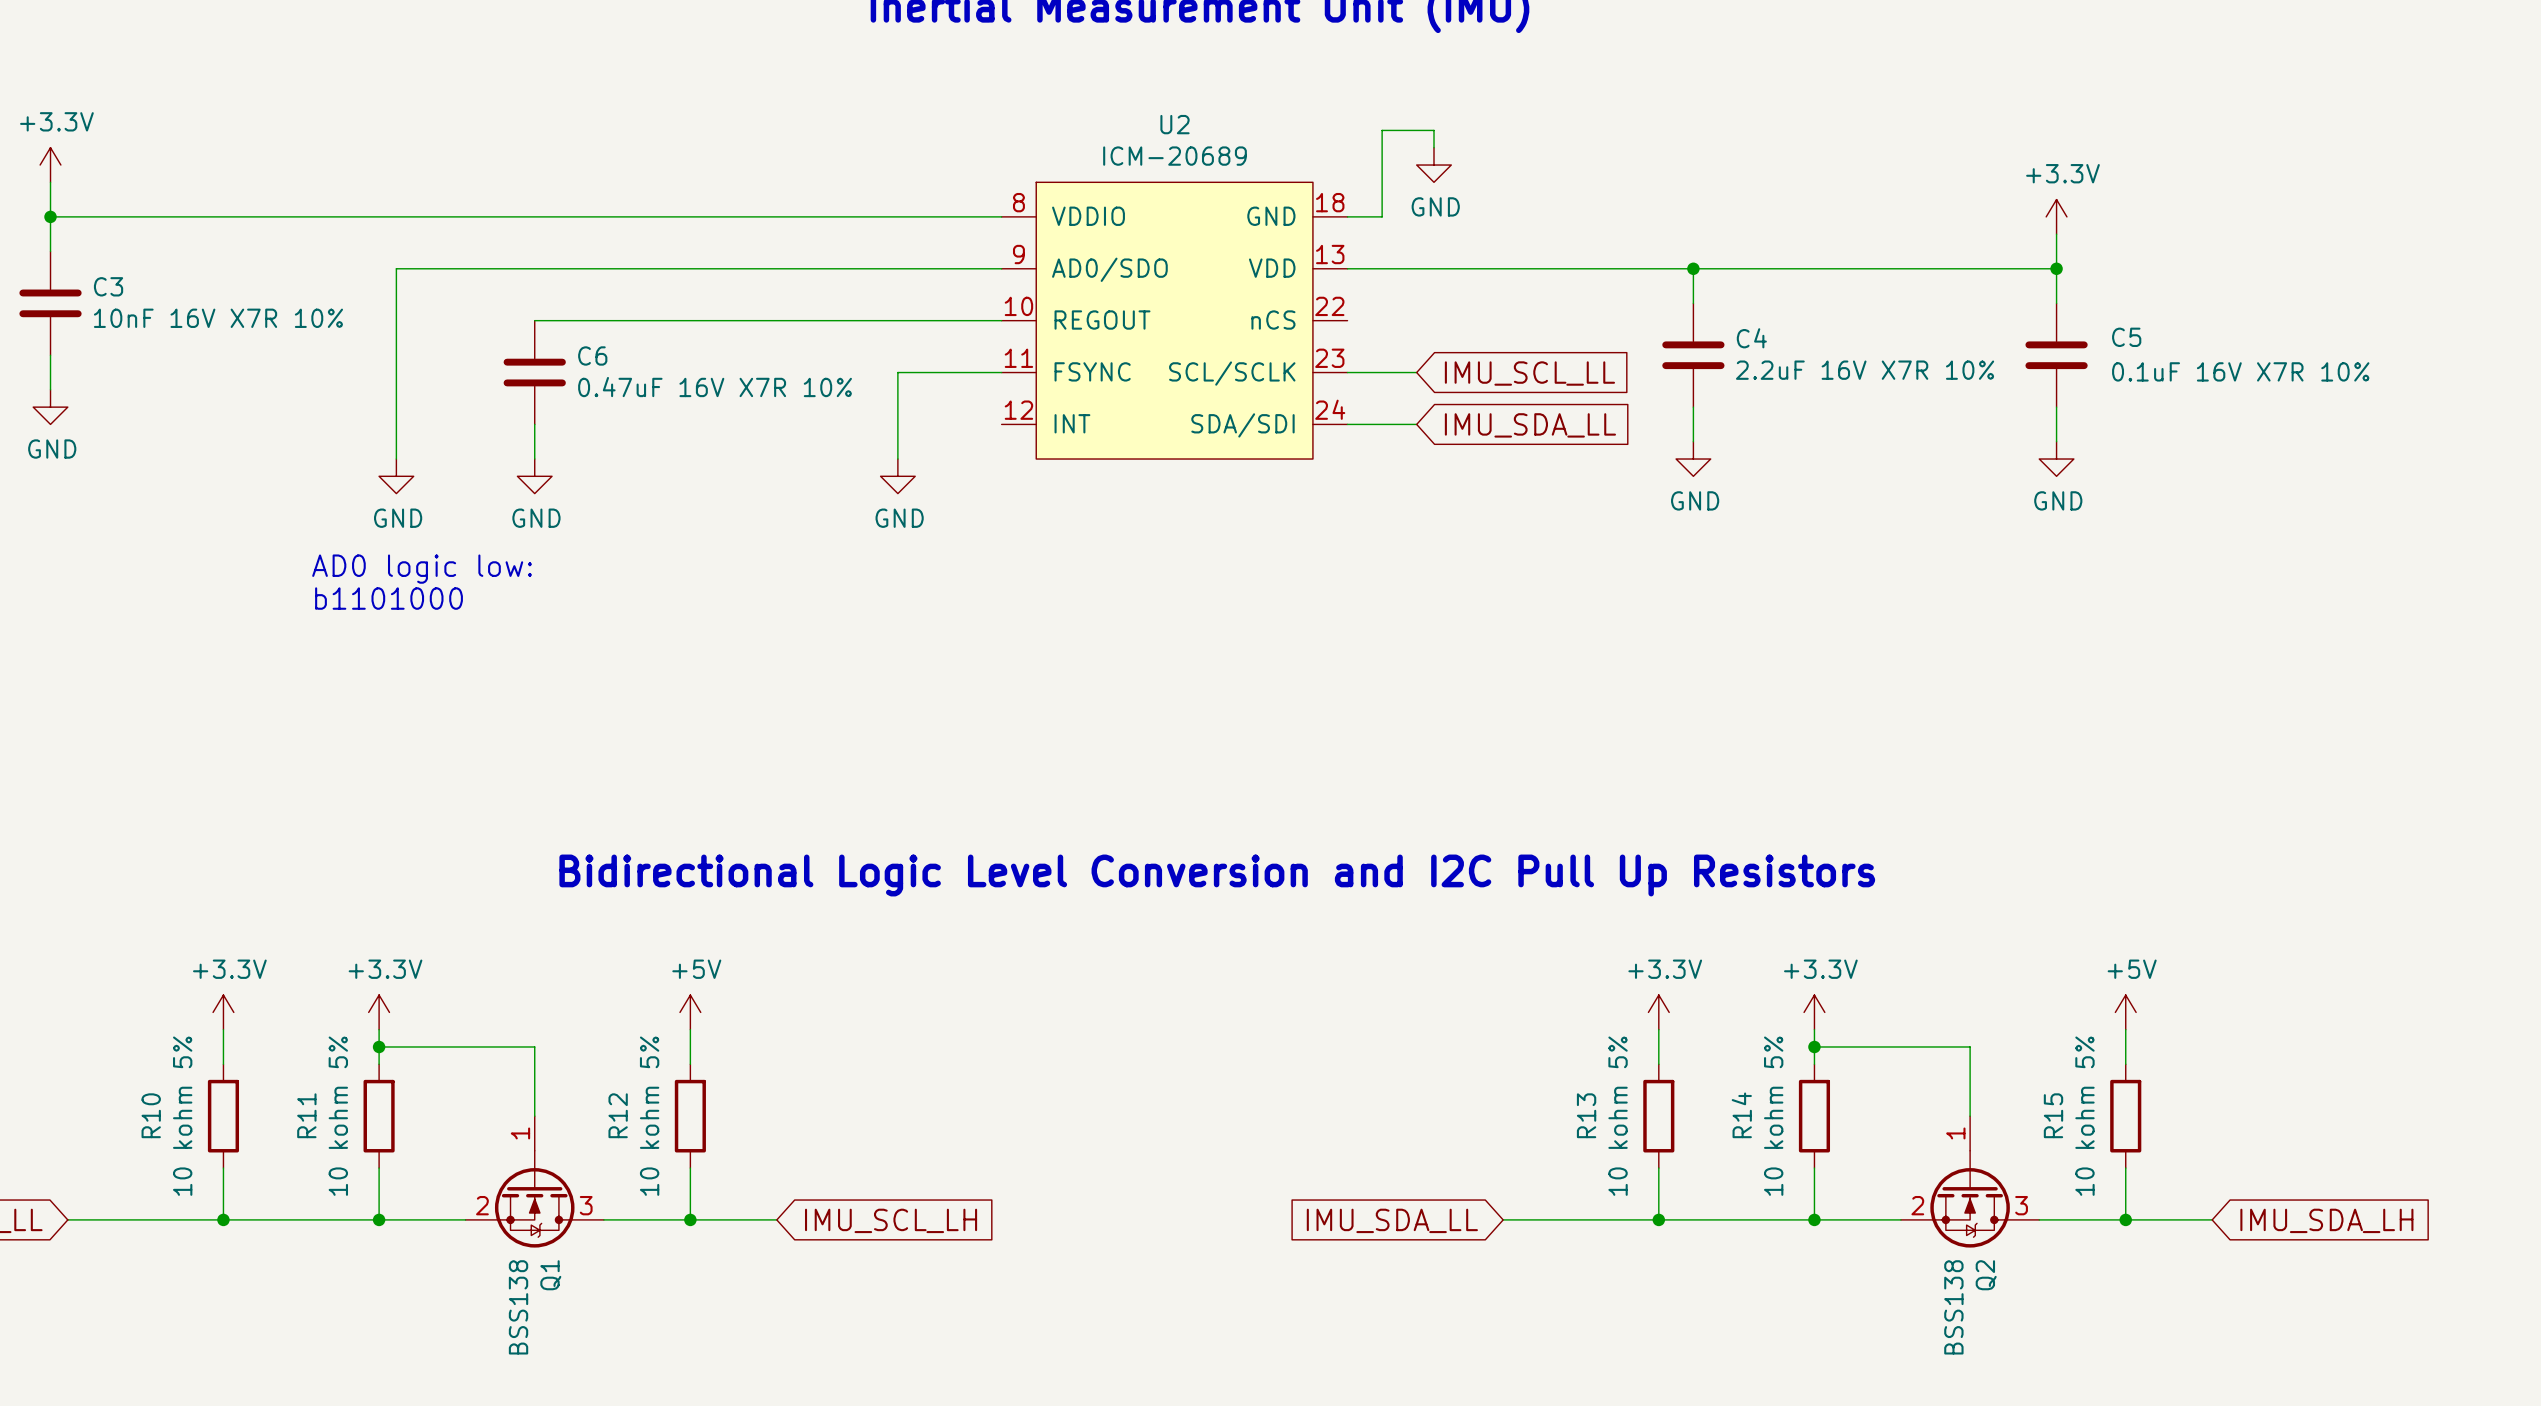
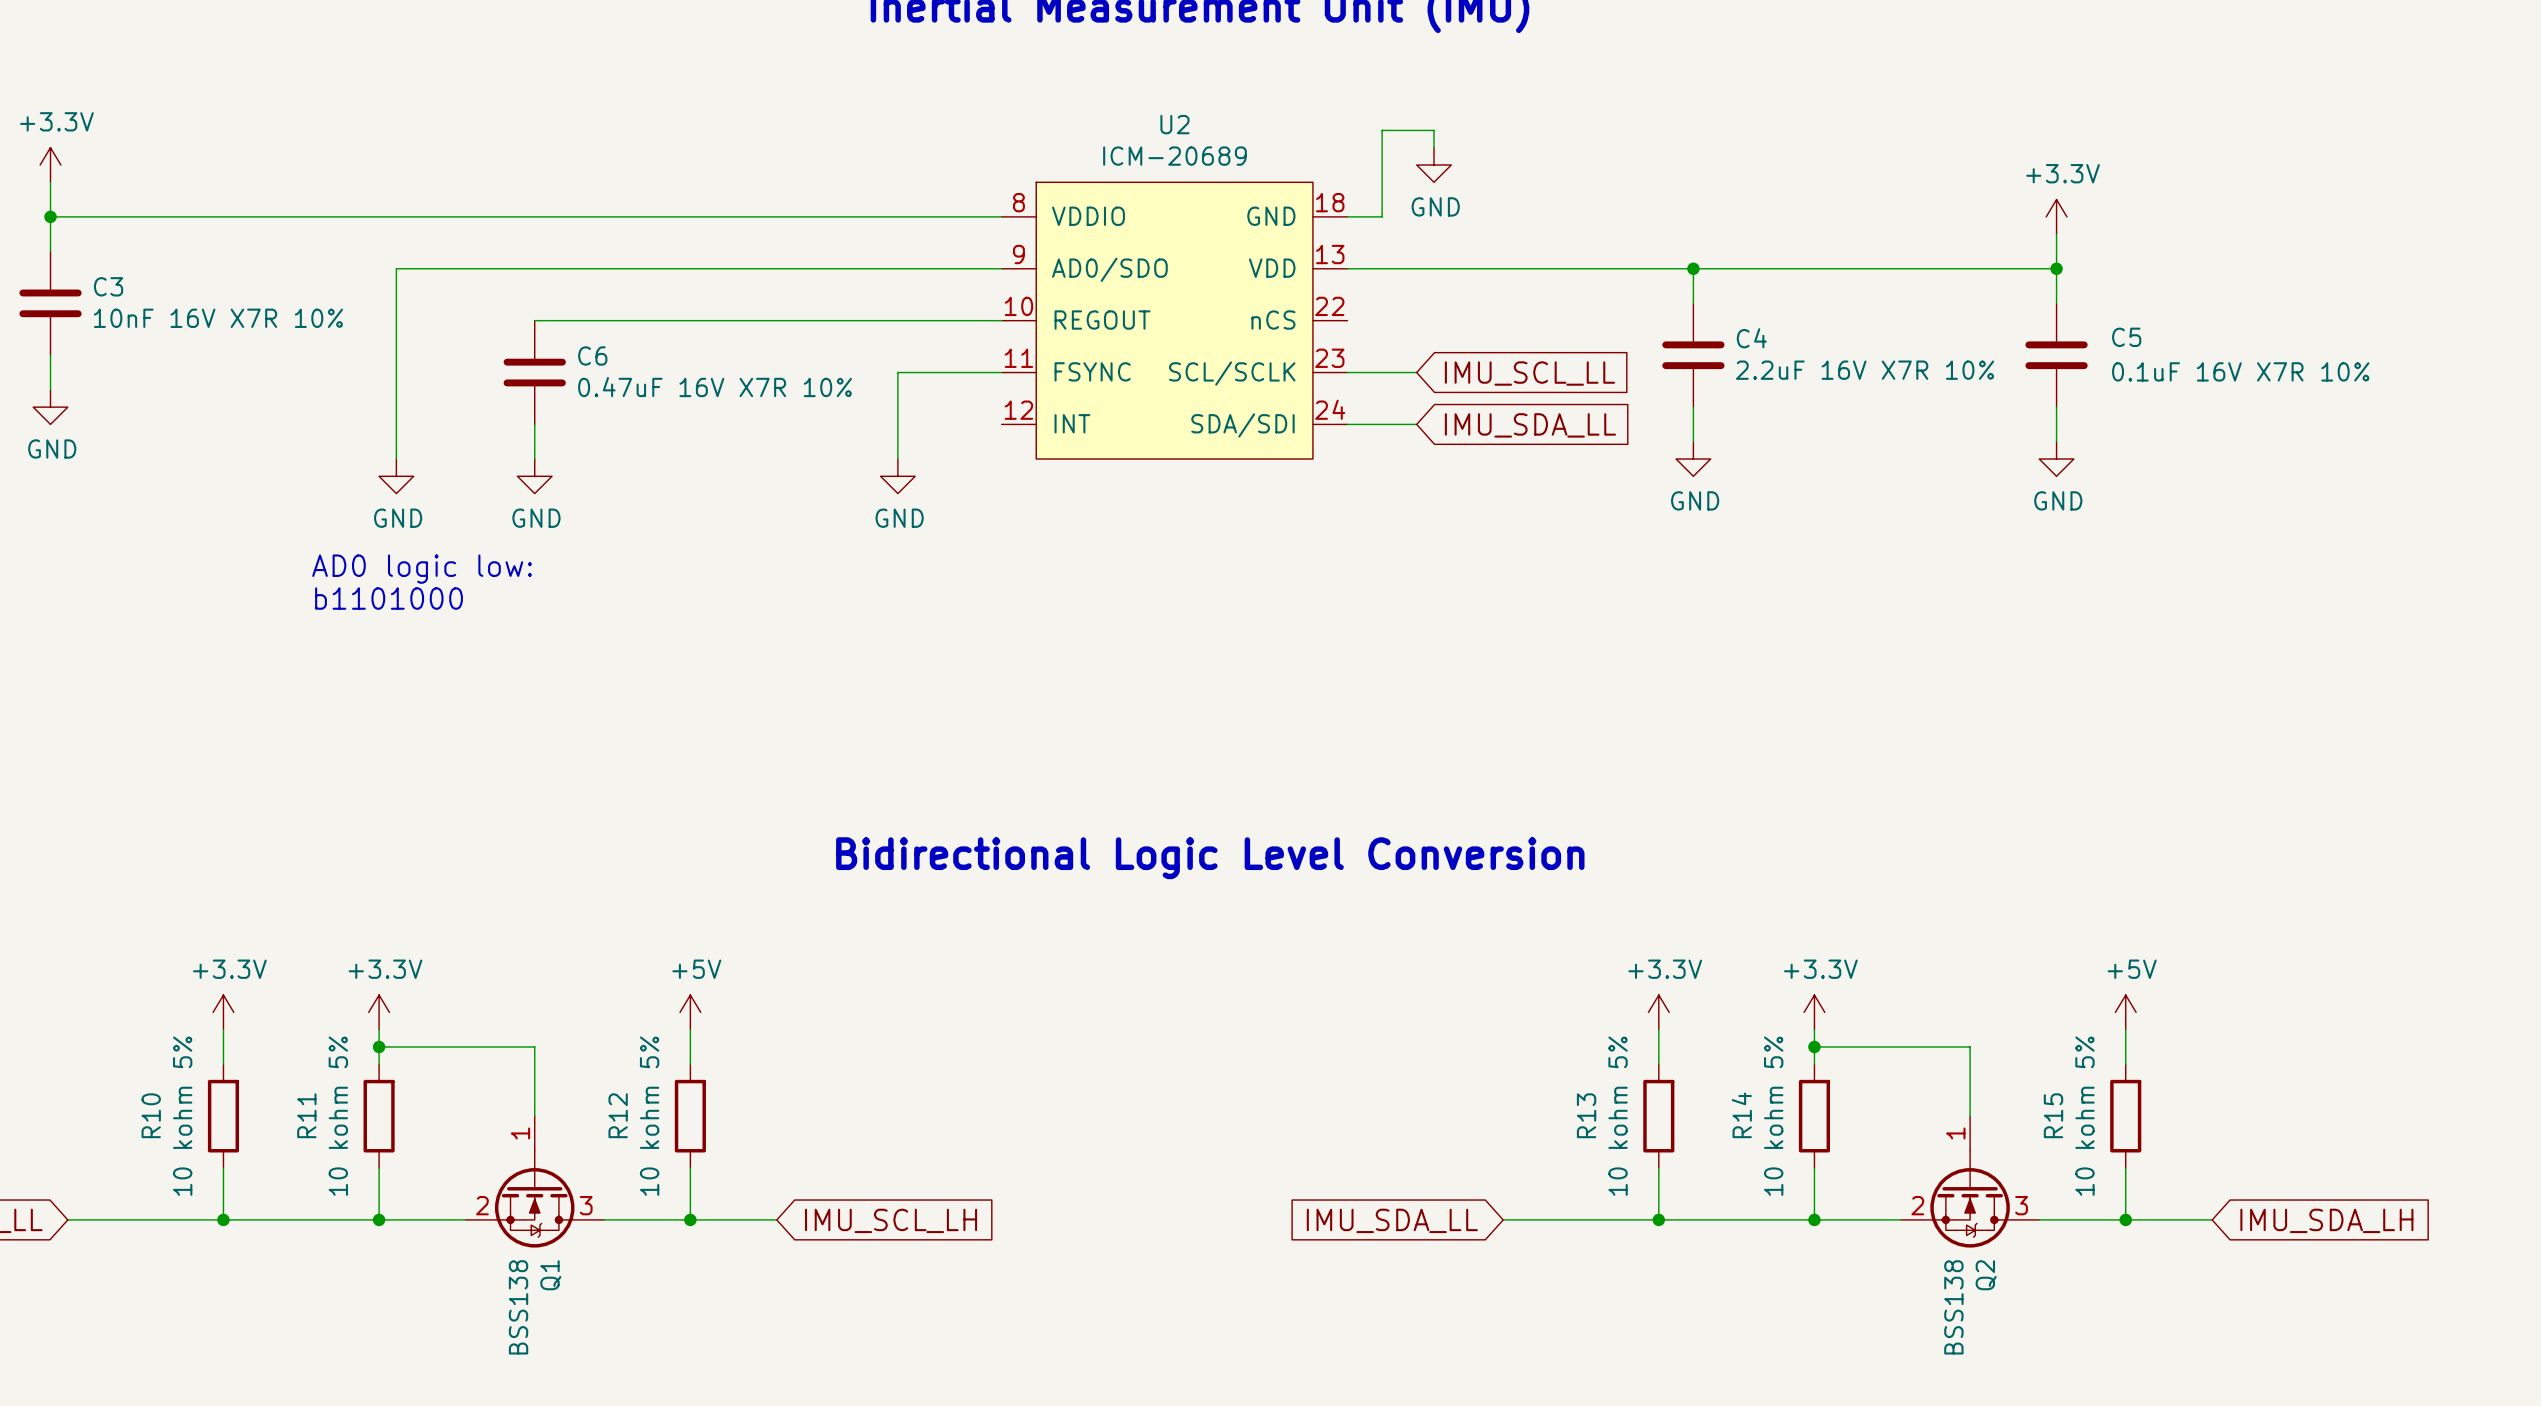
text: Bidirectional Logic Level Conversion and I2C Pull Up Resistors (1217, 875) -> Bidirectional Logic Level Conversion (1210, 858)

